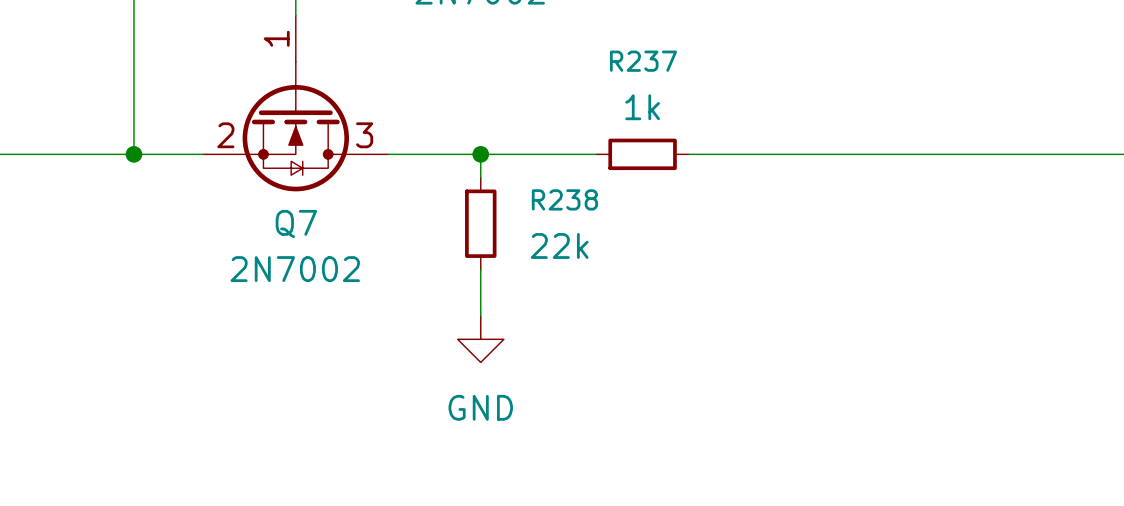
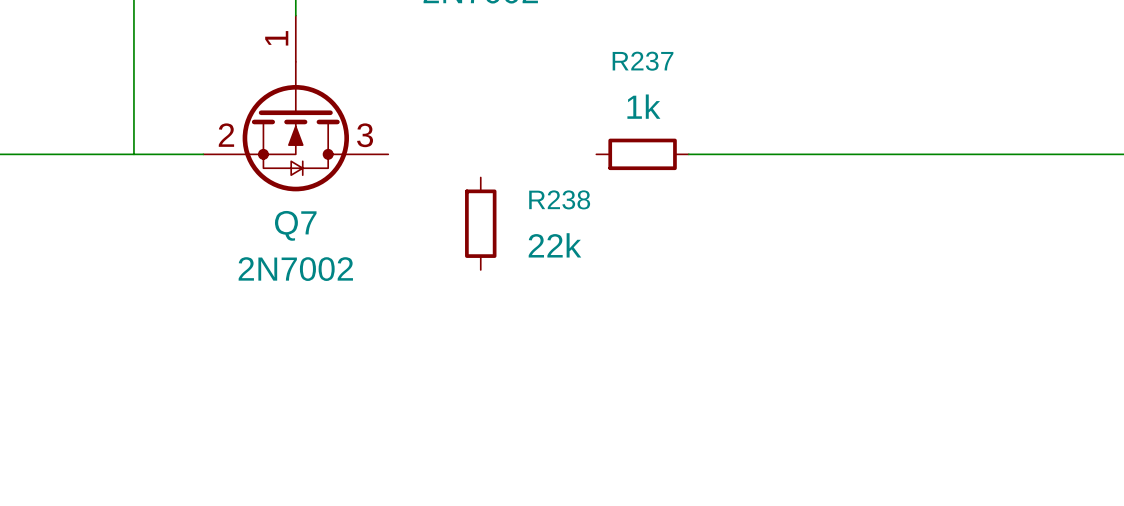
junction: (133, 154) -> none
wire: (388, 154) (596, 154) -> none
wire: (480, 154) (480, 177) -> none
junction: (480, 154) -> none
wire: (480, 269) (480, 316) -> none
power symbol: GND (480, 339) -> none

